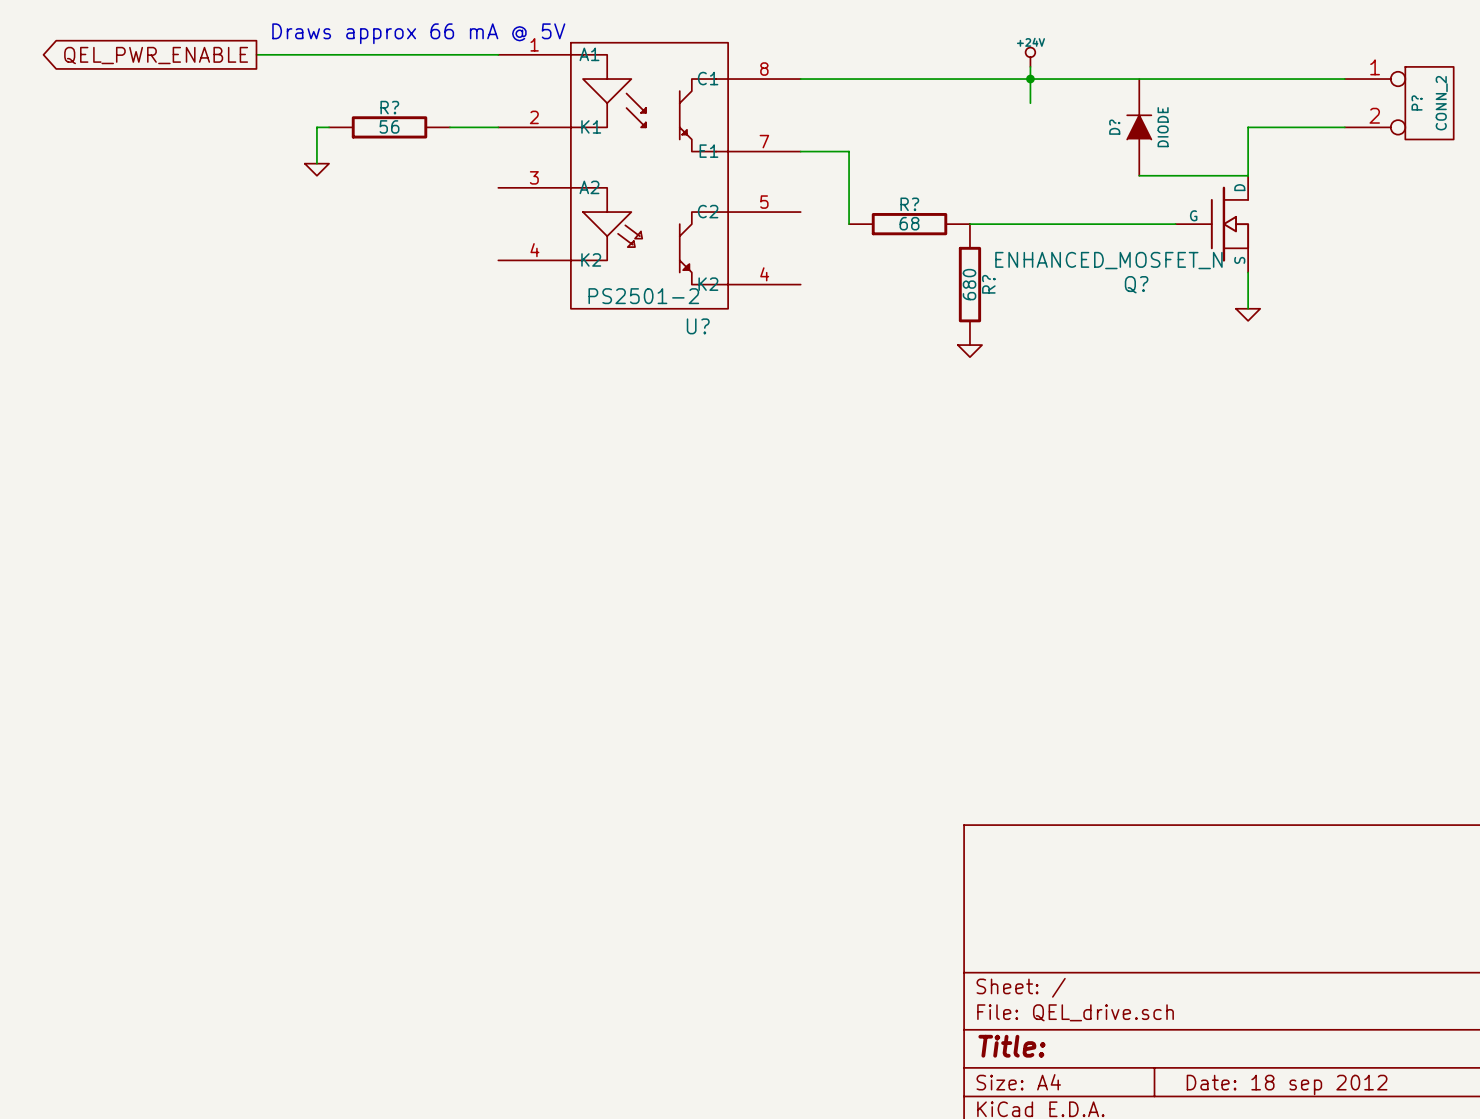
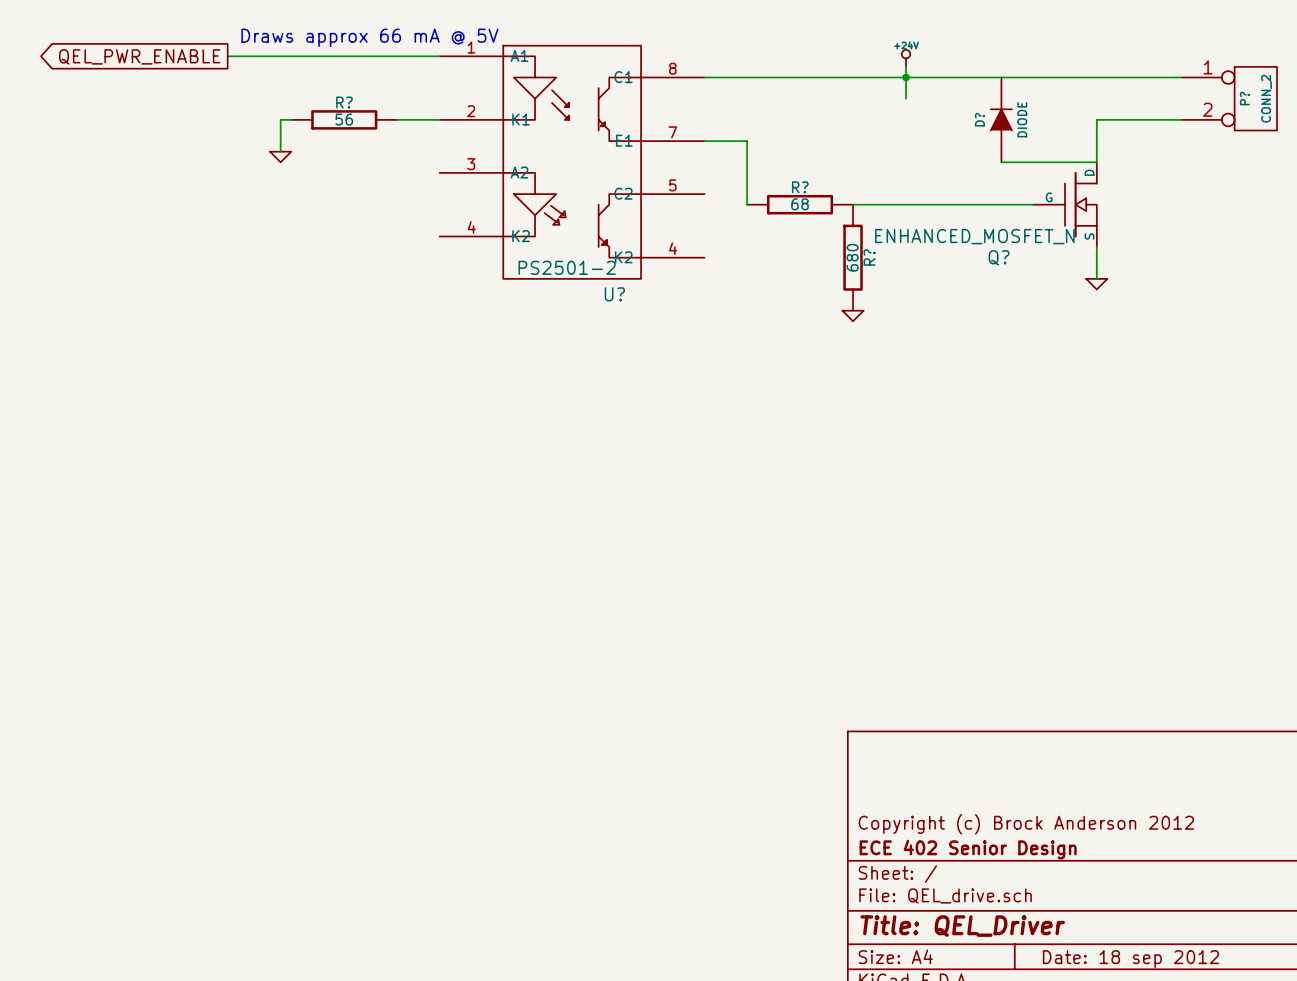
title block: none -> Copyright (c) Brock Anderson 2012 (1026, 824)
title block: none -> ECE 402 Senior Design (968, 849)
title block: Title: (1011, 1046) -> Title: QEL_Driver (962, 926)

